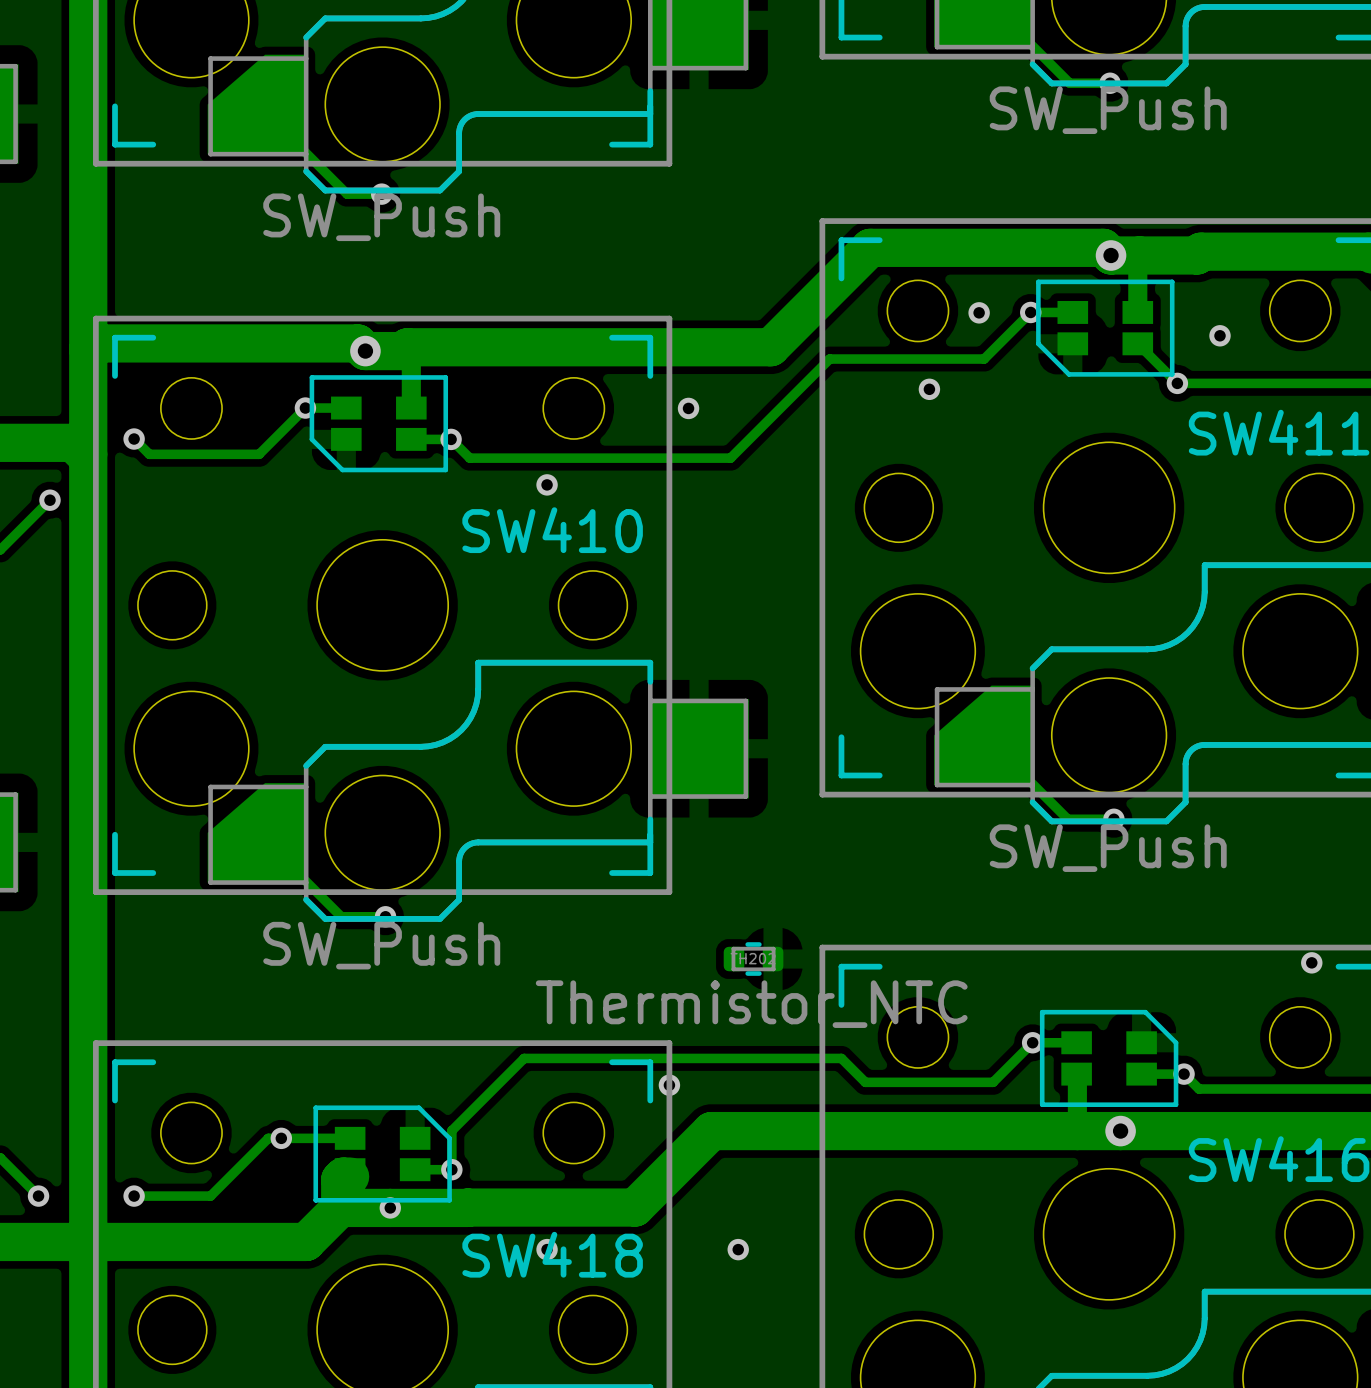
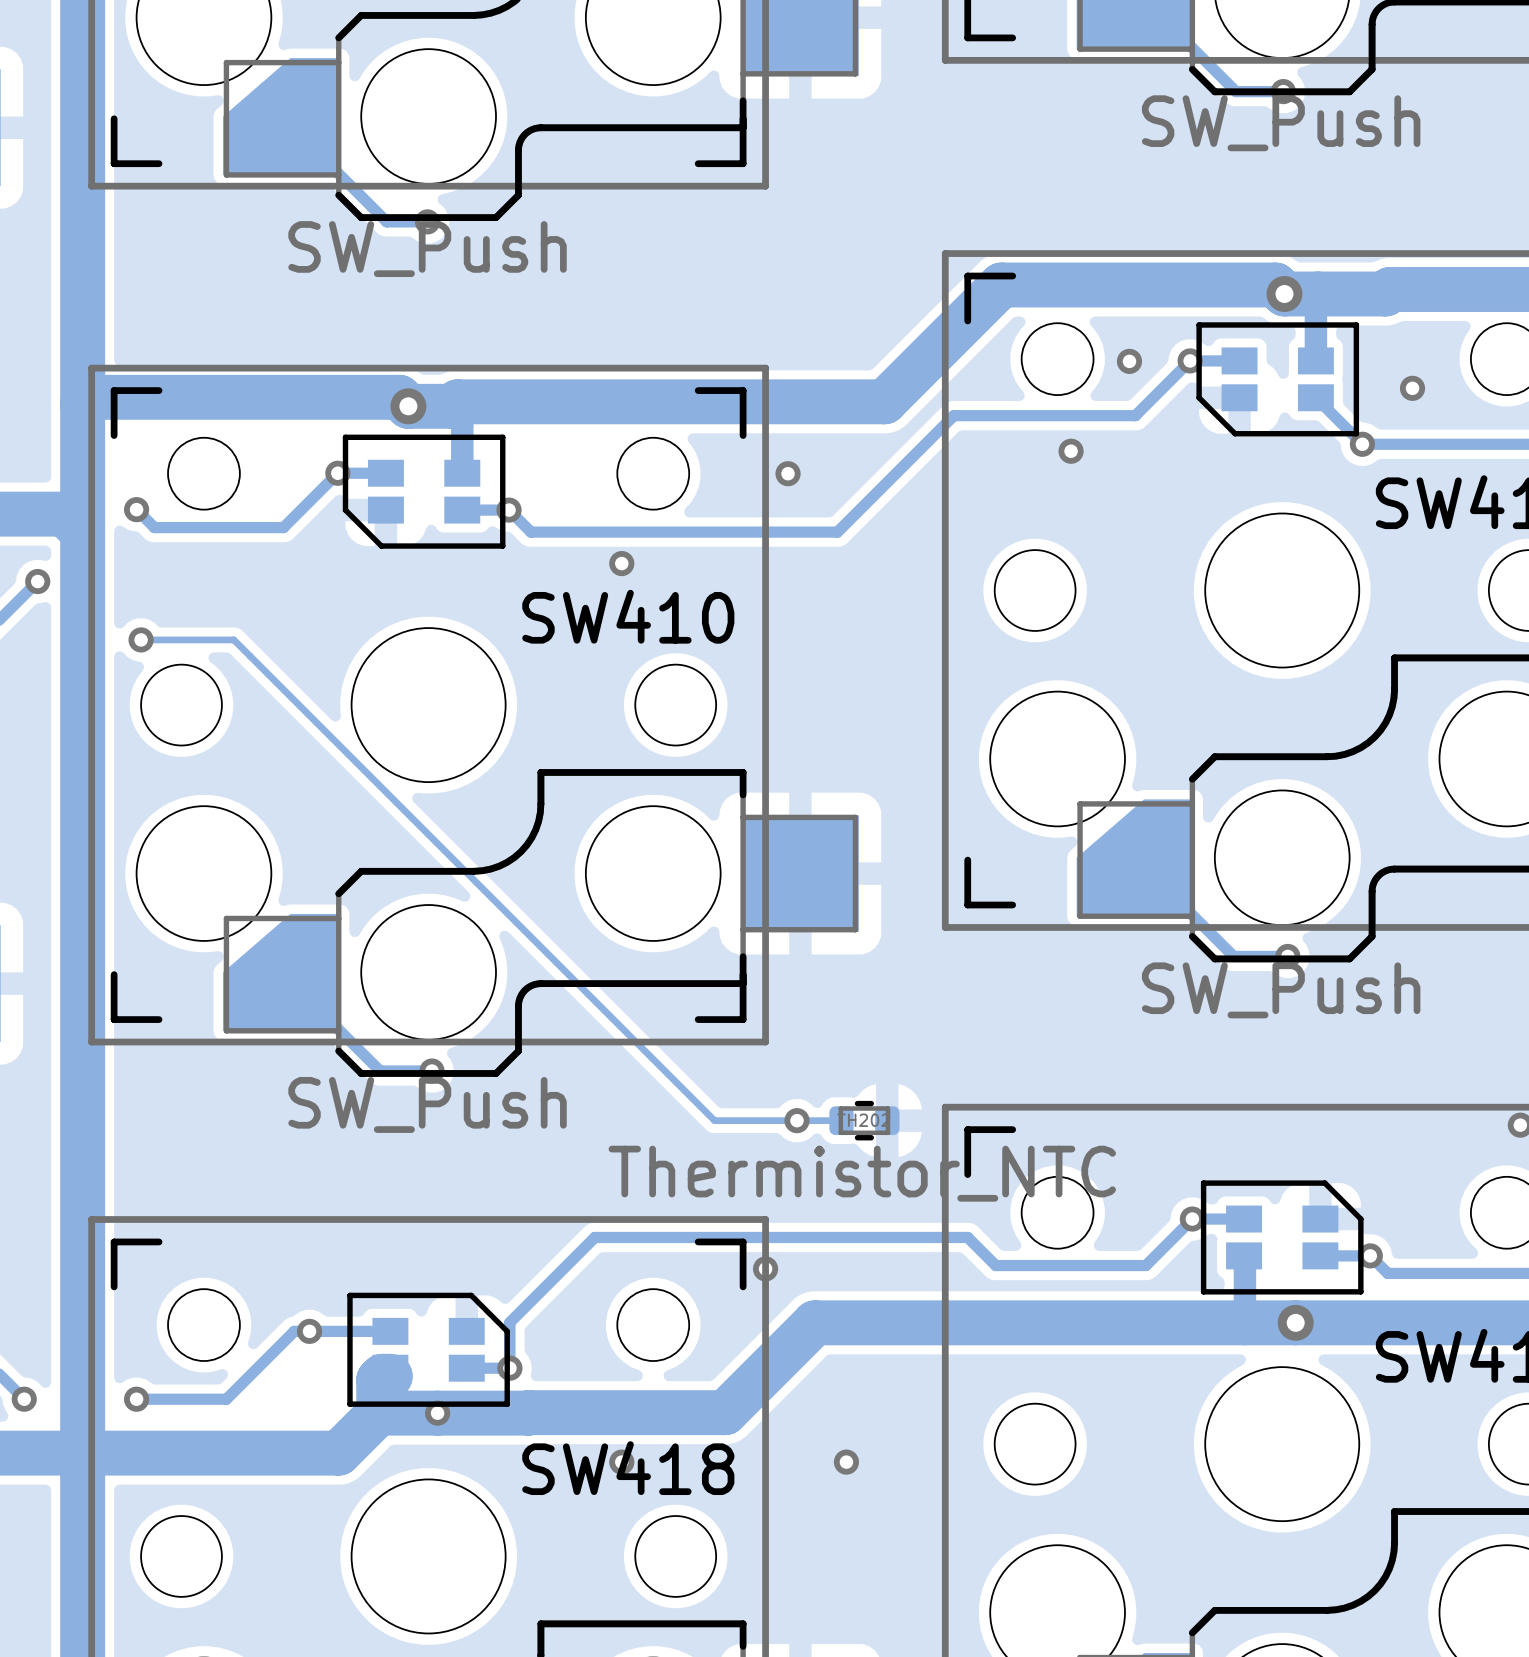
track: none -> (141, 639) (233, 639) (714, 1120) (841, 1120)
via: none -> (141, 639)
via: none -> (797, 1120)

